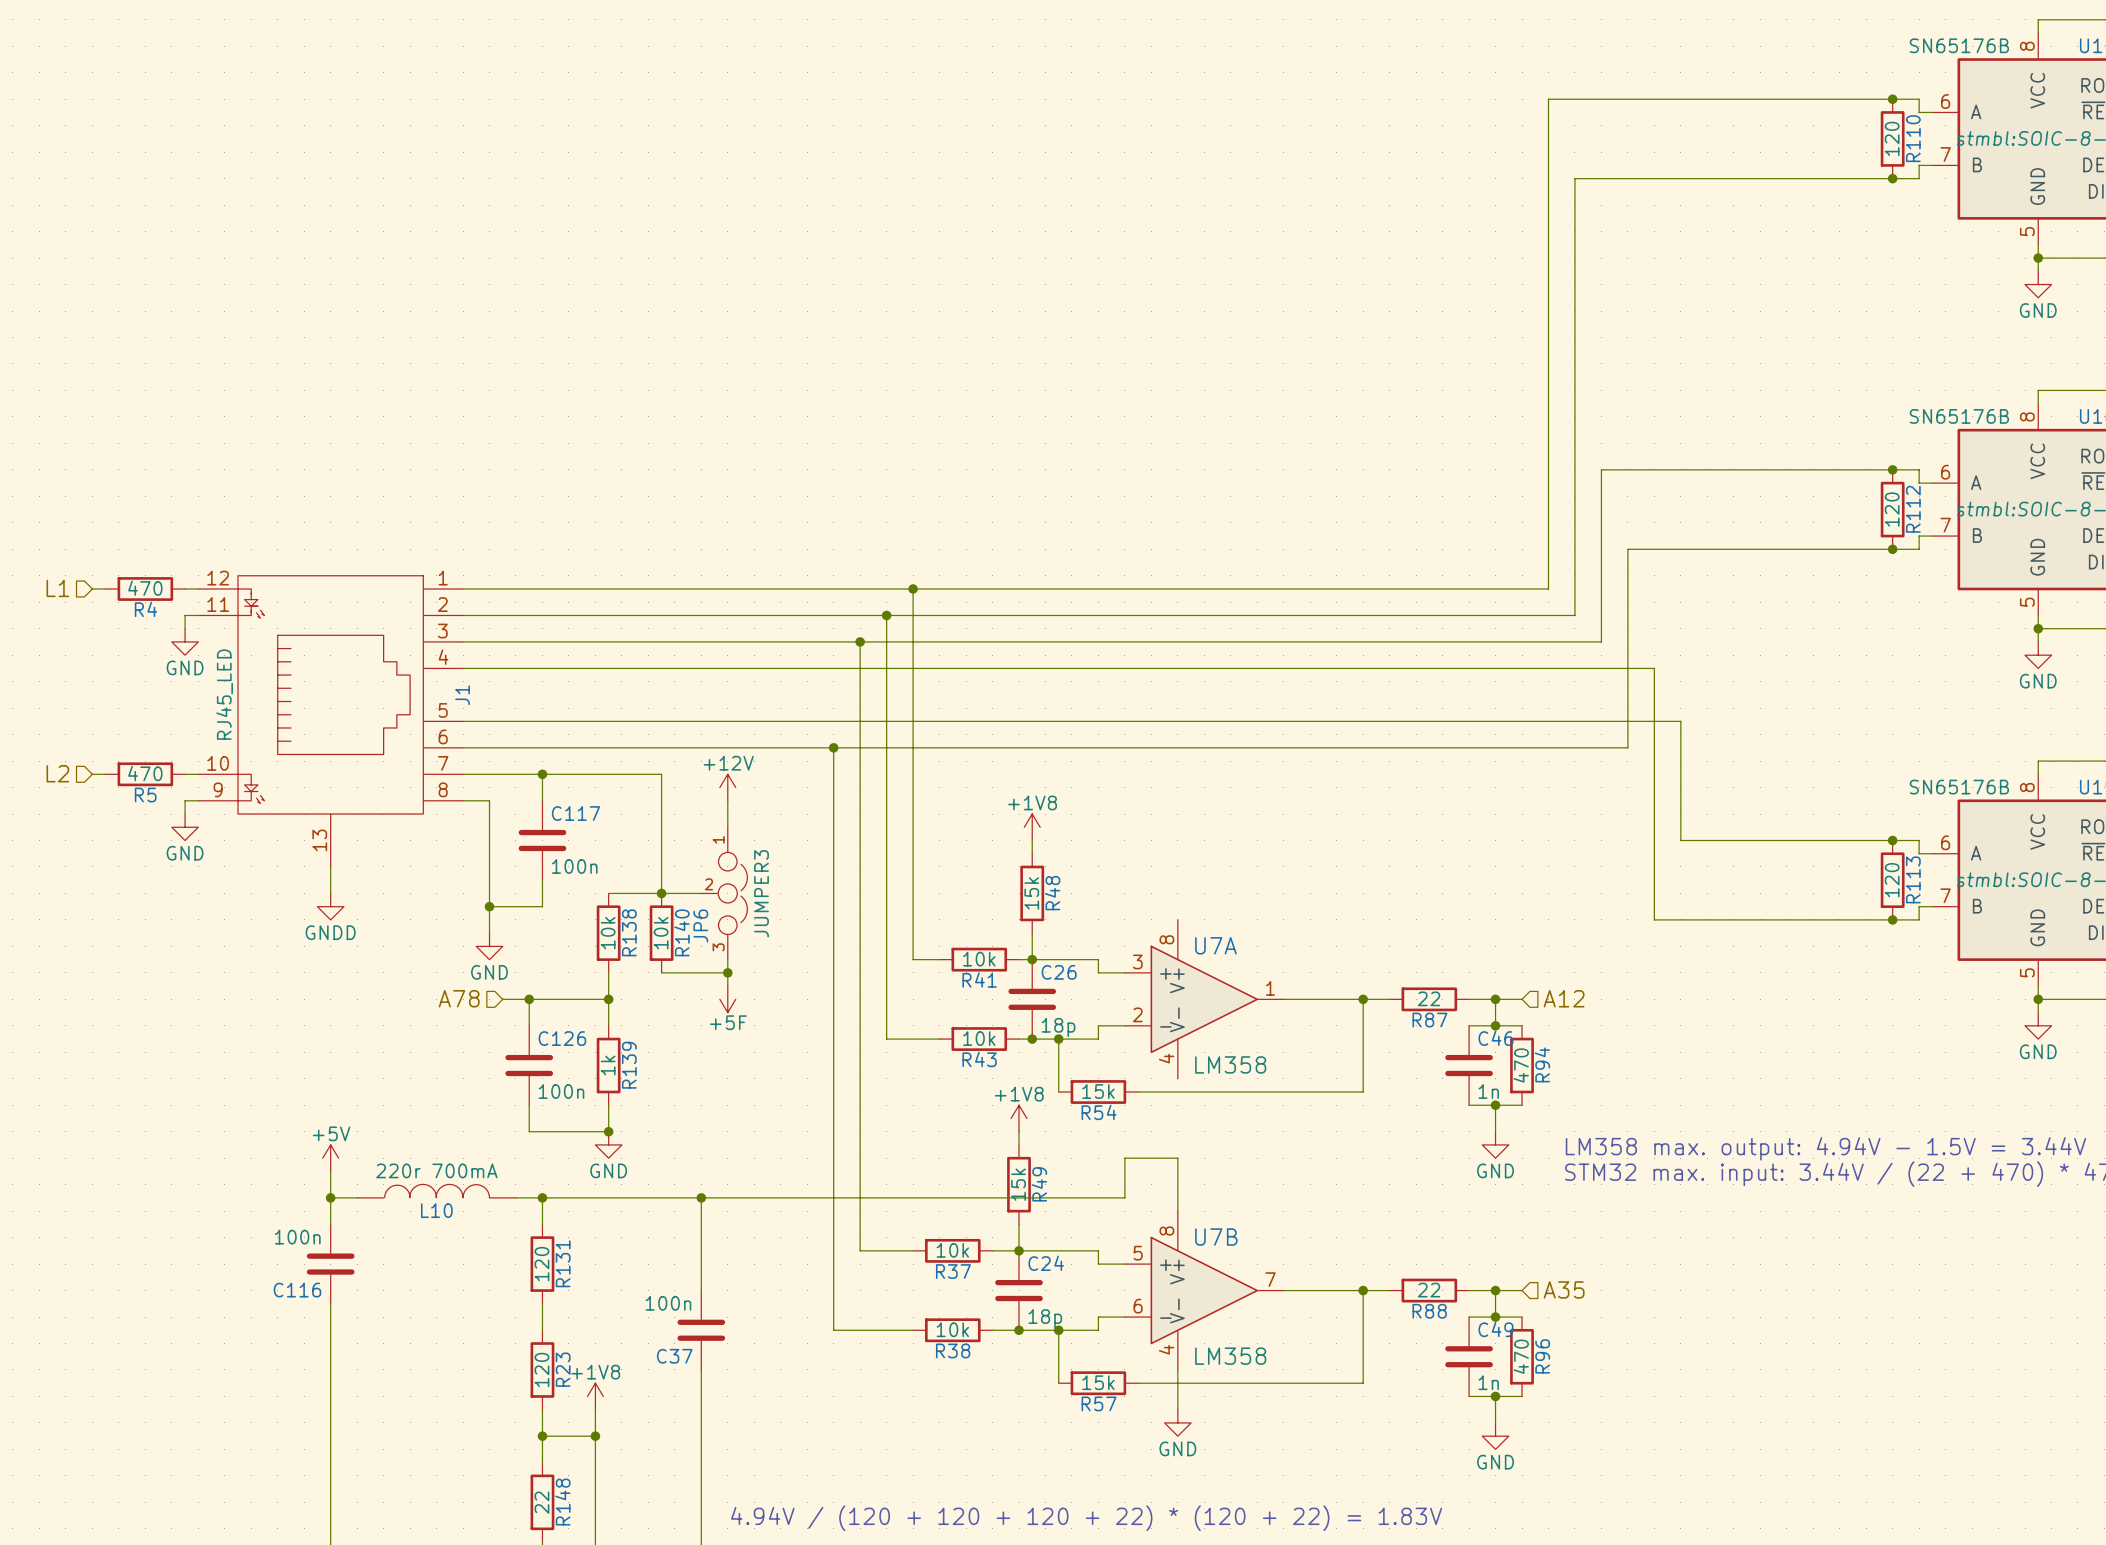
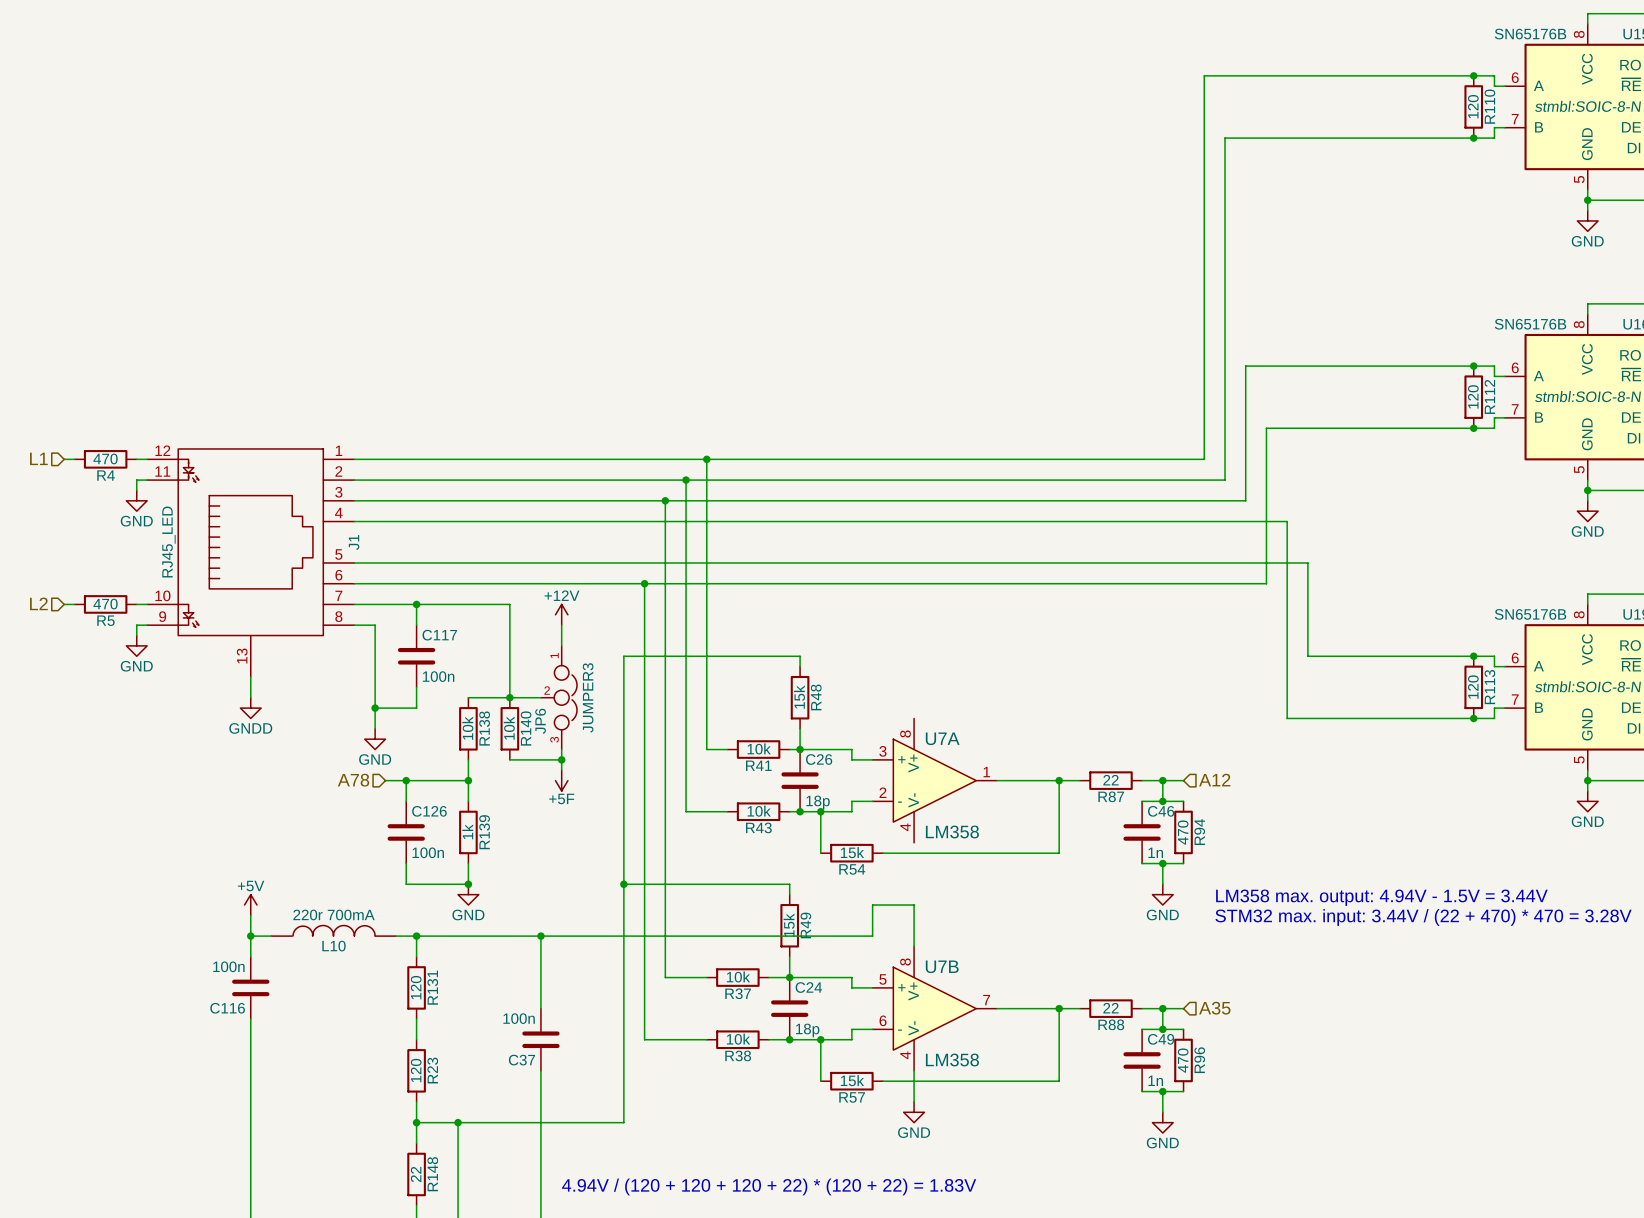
power symbol: +1V8 (1032, 827) -> none
power symbol: +1V8 (1019, 1118) -> none
wire: none -> (623, 884) (789, 884)
junction: none -> (623, 884)
power symbol: +1V8 (595, 1396) -> none
wire: (595, 1409) (595, 1436) -> (800, 656) (623, 656) (623, 1122) (458, 1122)

